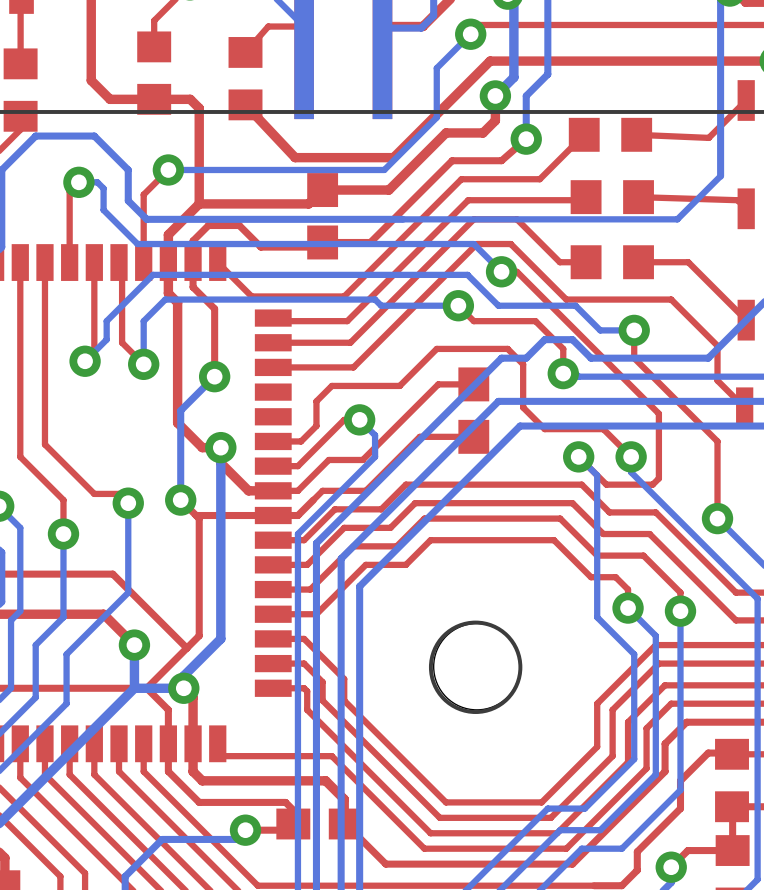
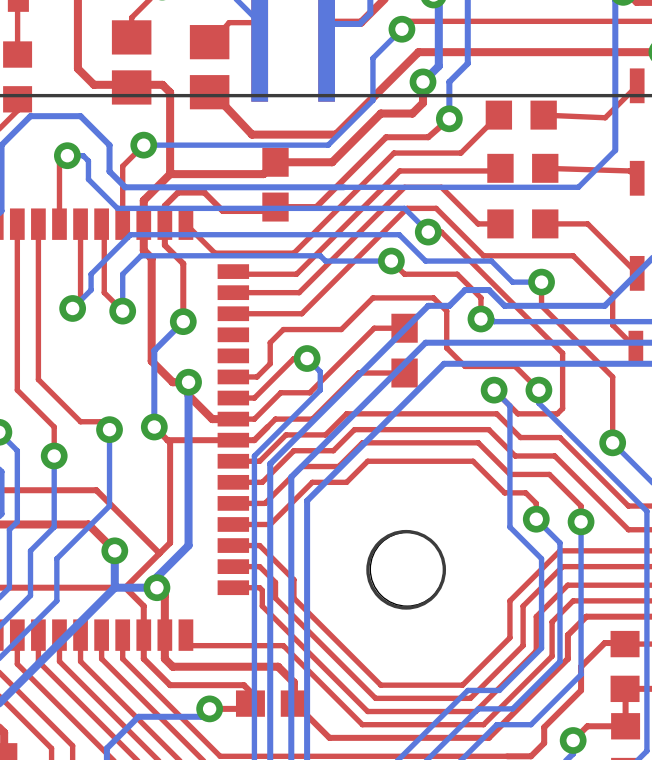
part footprint: [137, 31, 172, 115] -> [111, 20, 152, 105]
part footprint: [228, 37, 263, 121] -> [189, 25, 230, 110]

